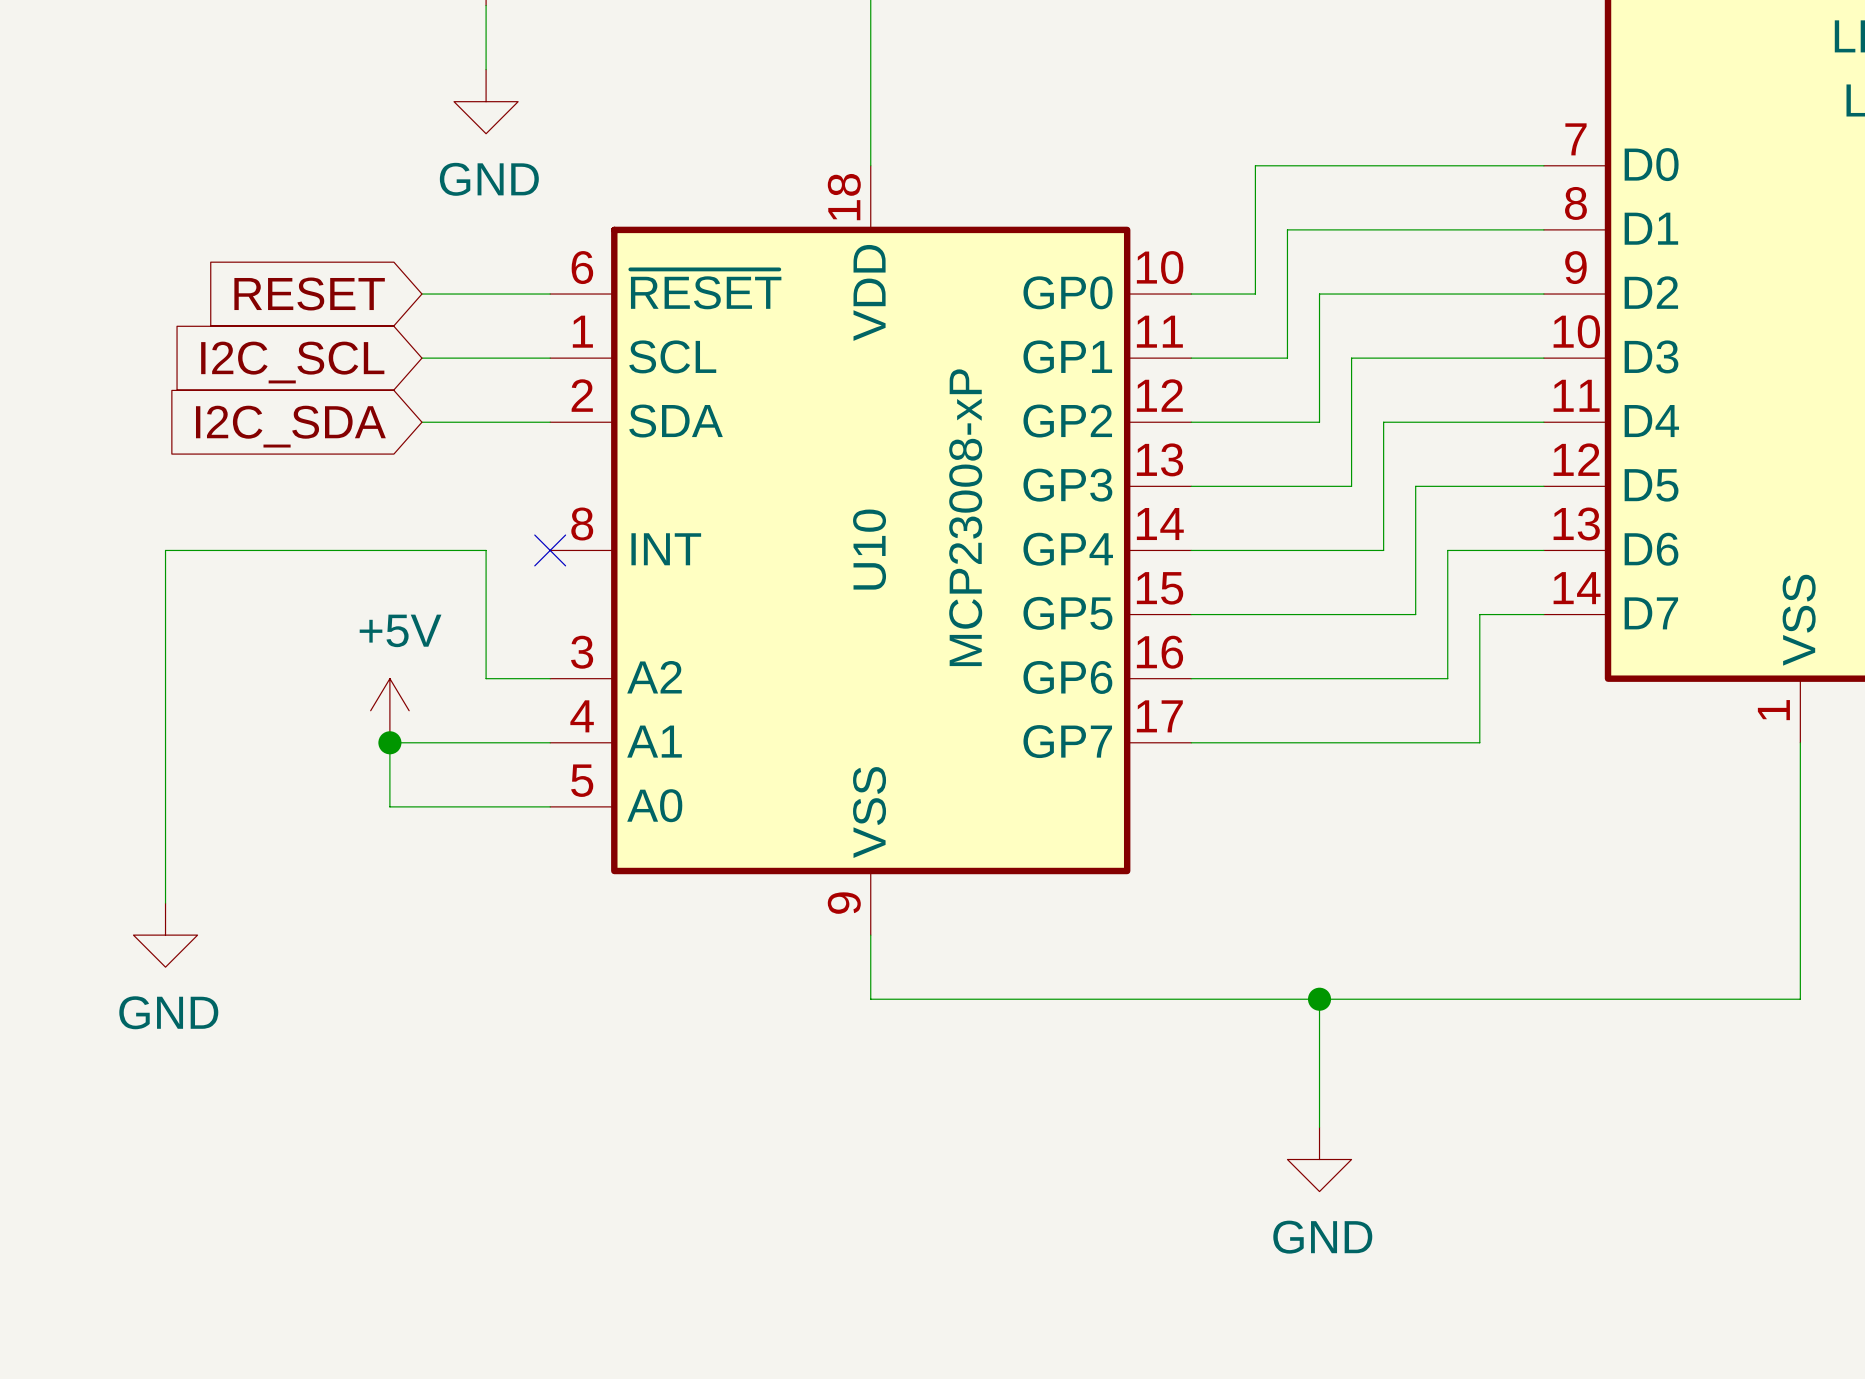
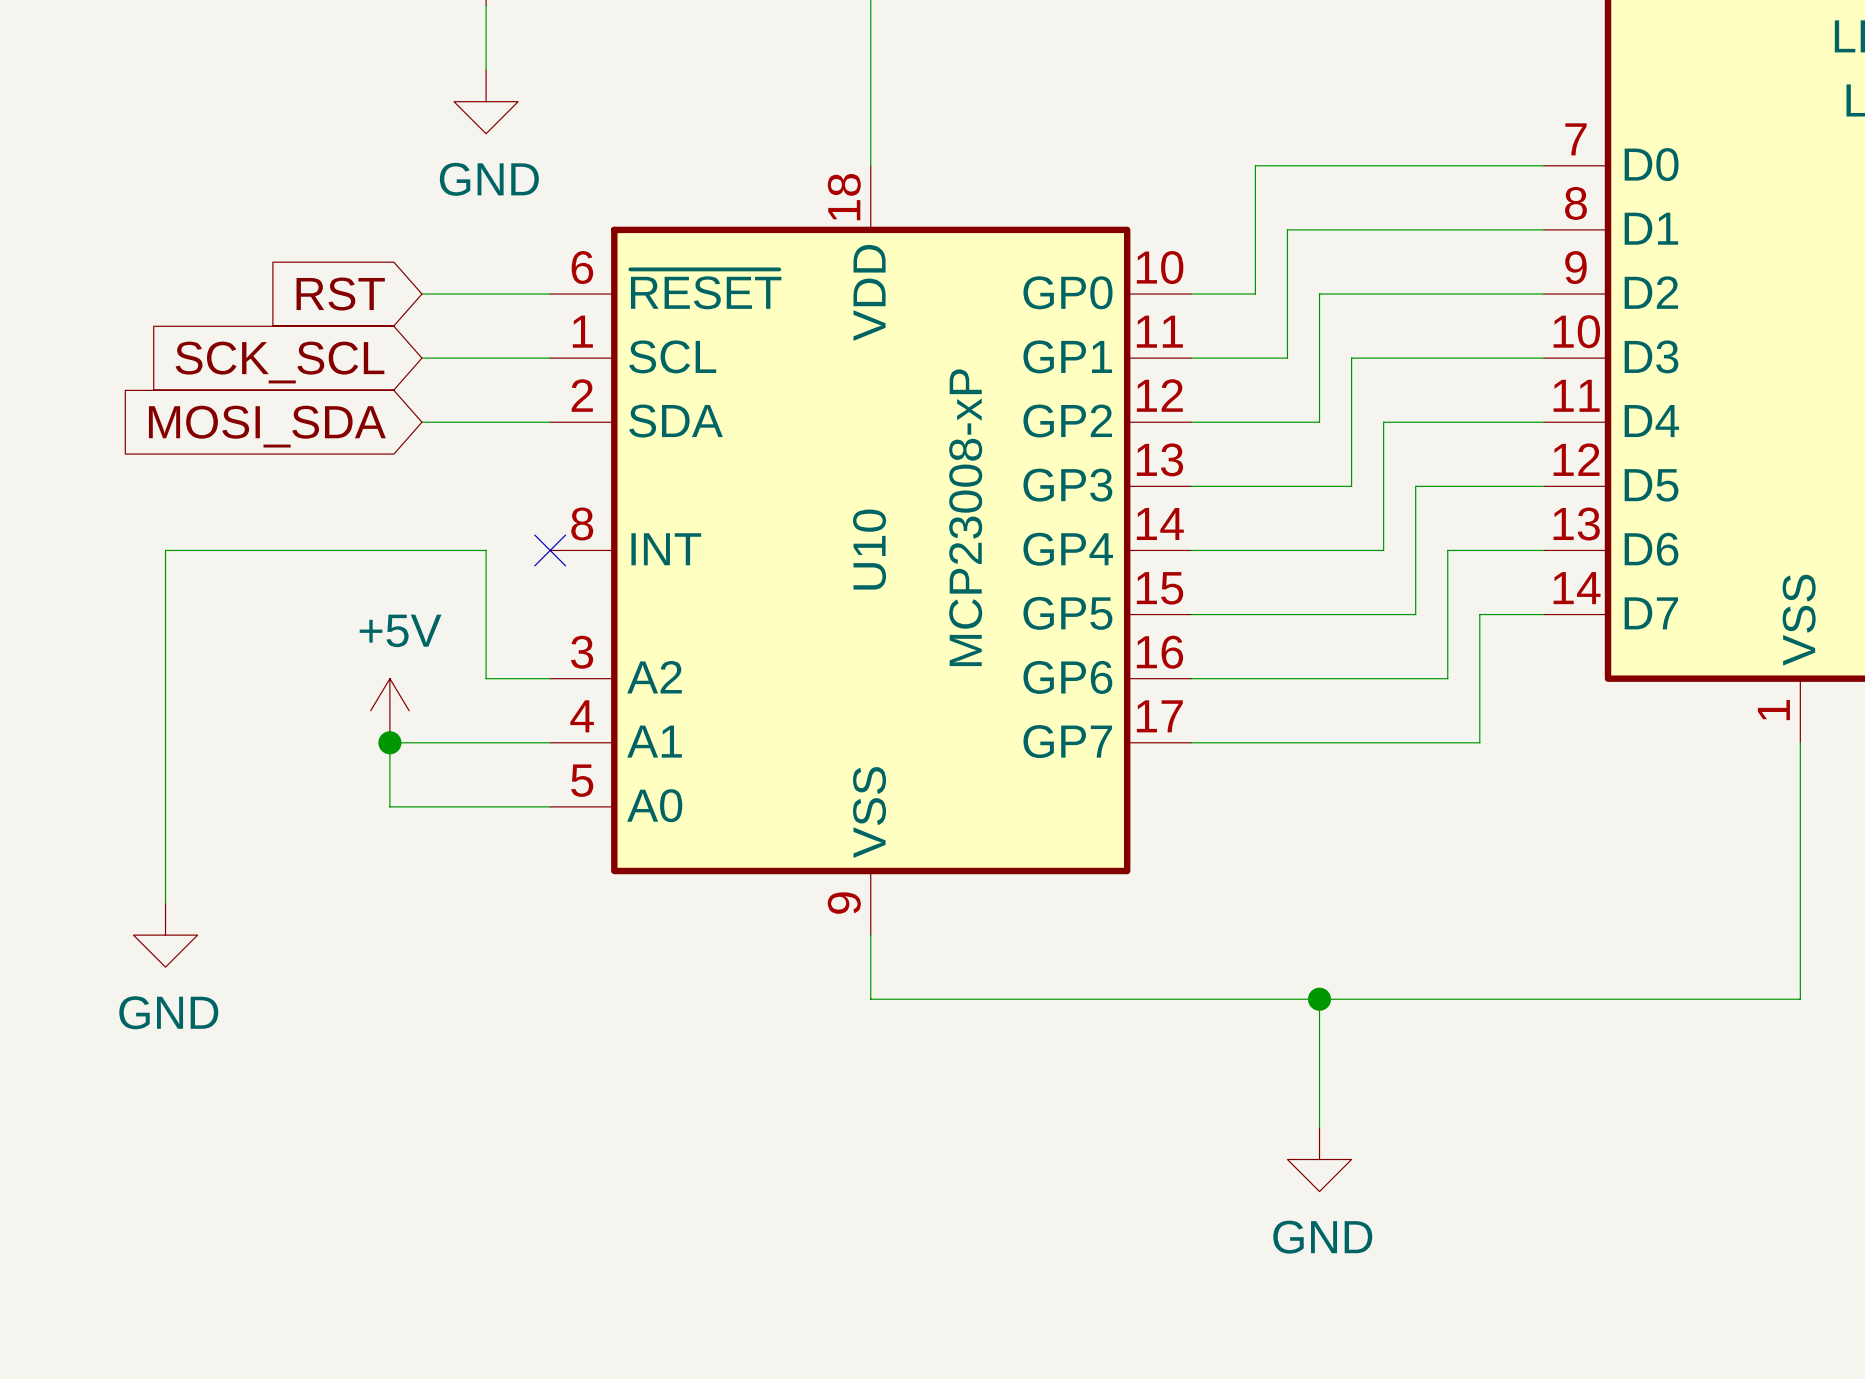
global label: RESET (309, 294) -> RST (340, 294)
global label: I2C_SCL (292, 362) -> SCK_SCL (280, 362)
global label: I2C_SDA (290, 426) -> MOSI_SDA (267, 426)

